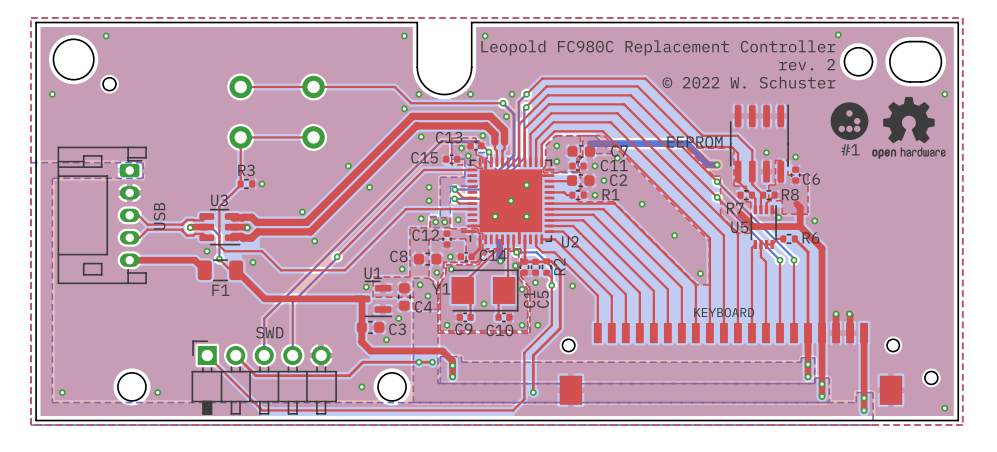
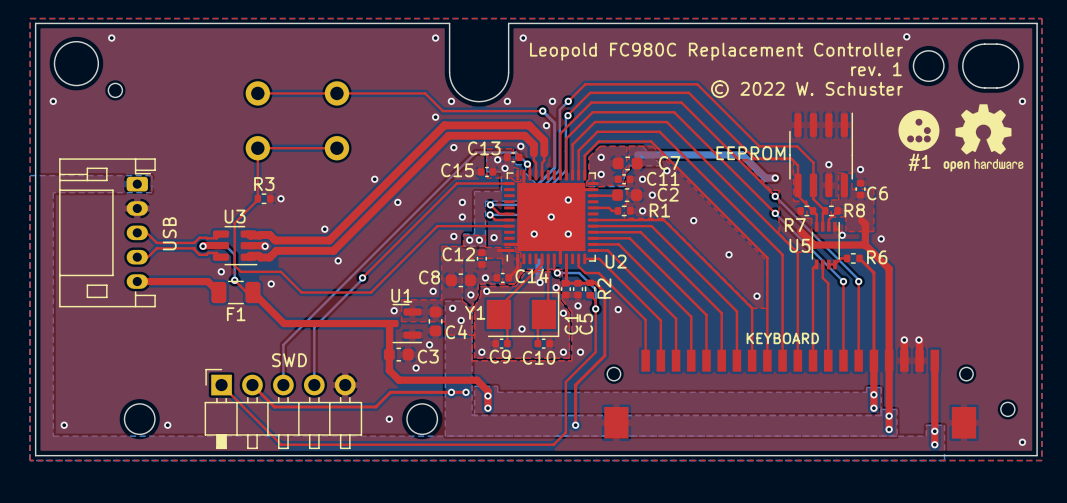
text: rev. 2 (807, 64) -> rev. 1 (876, 69)

